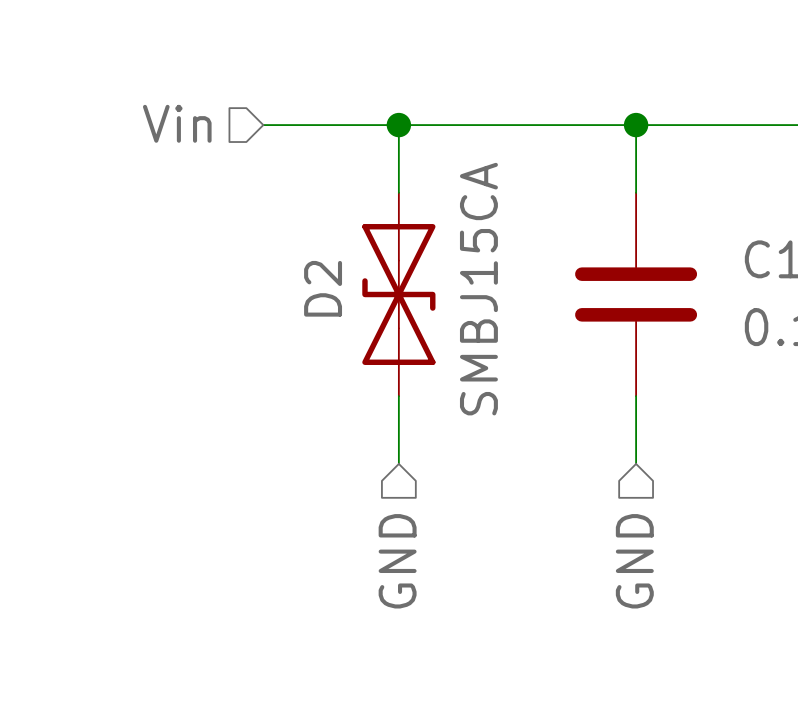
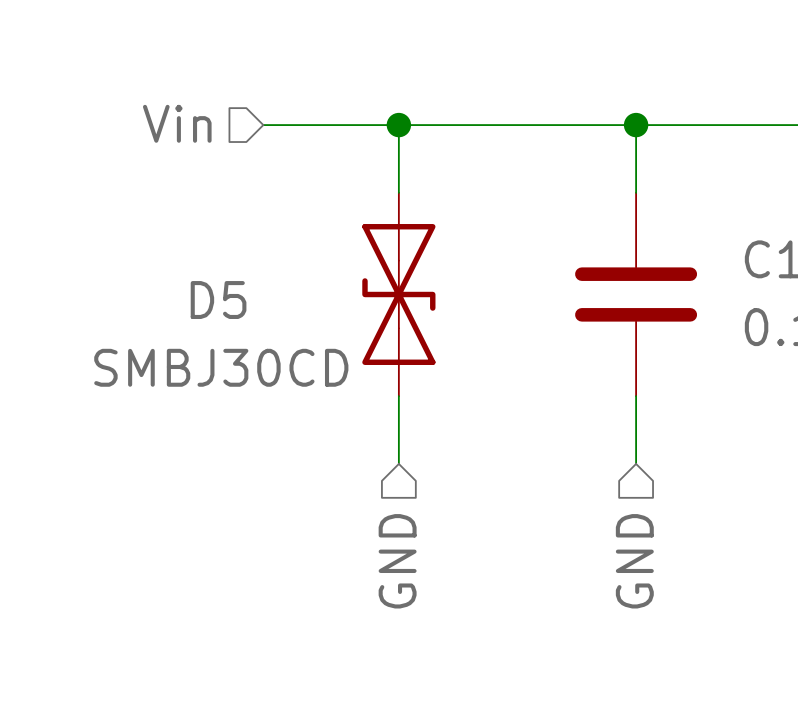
D2 name: D2 (323, 288) -> D5 (218, 300)
D2 value: SMBJ15CA (478, 289) -> SMBJ30CD (221, 367)

